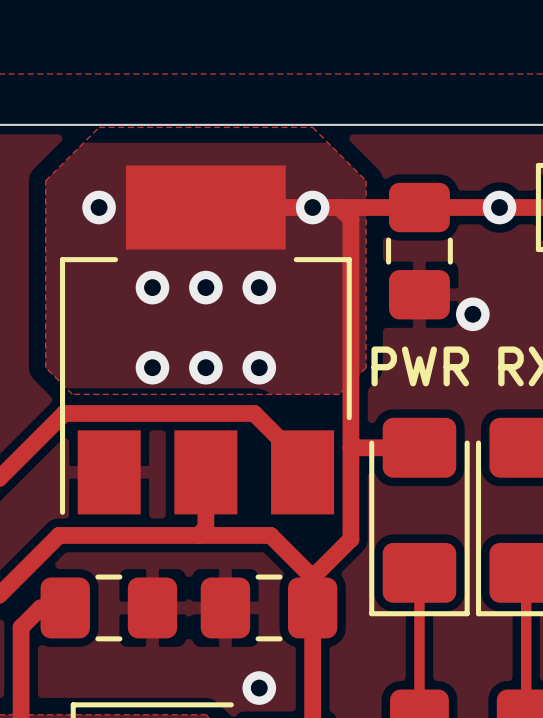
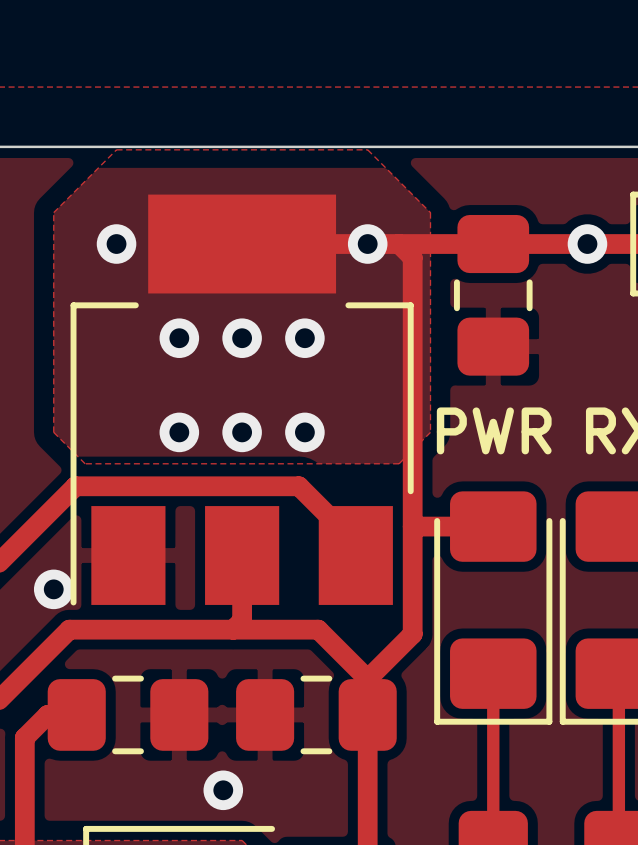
via: (472, 314) -> none
via: none -> (53, 589)
via position: (259, 688) -> (223, 790)

